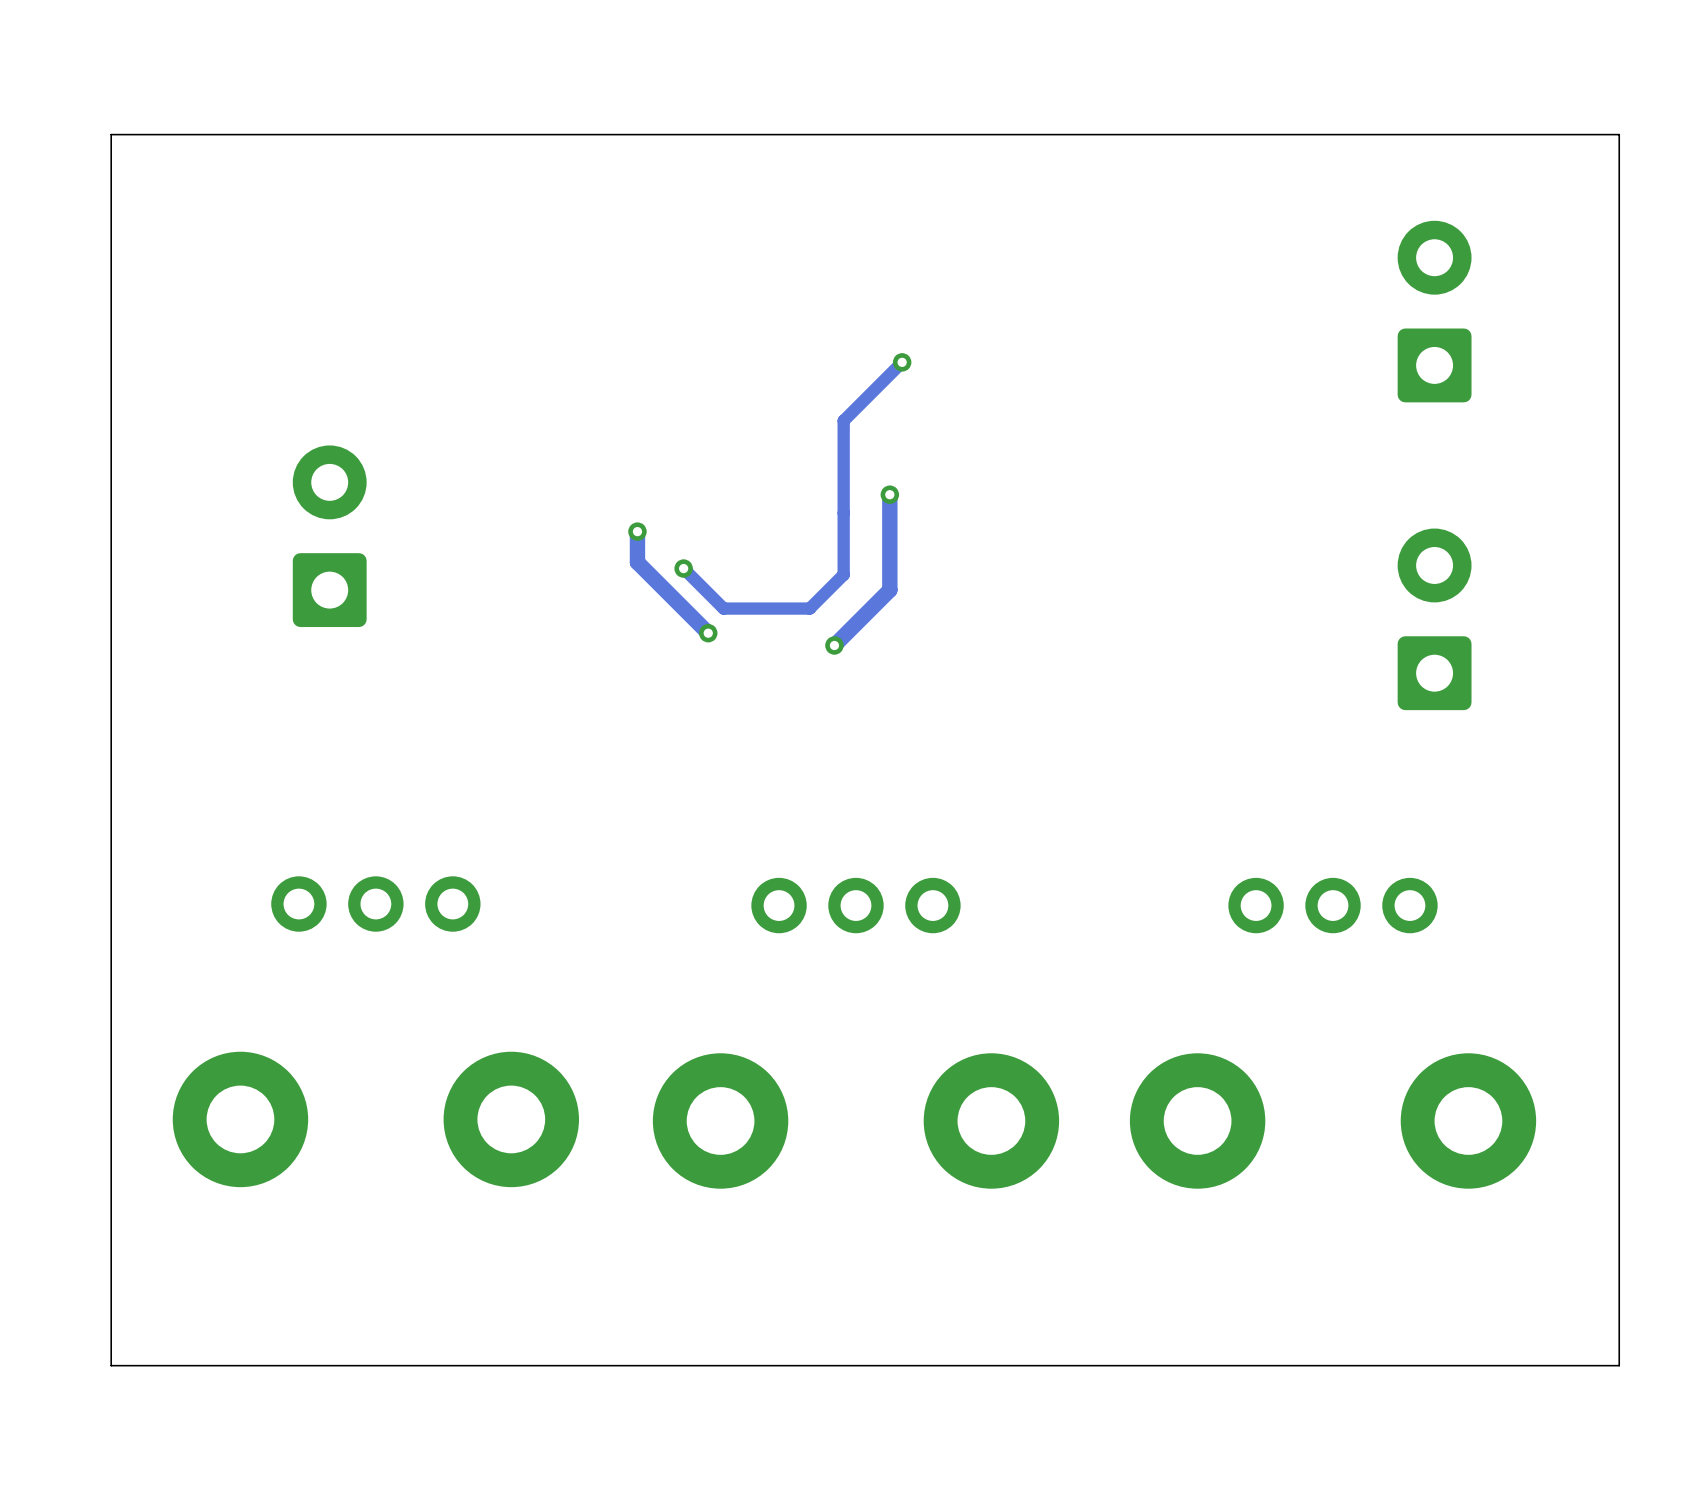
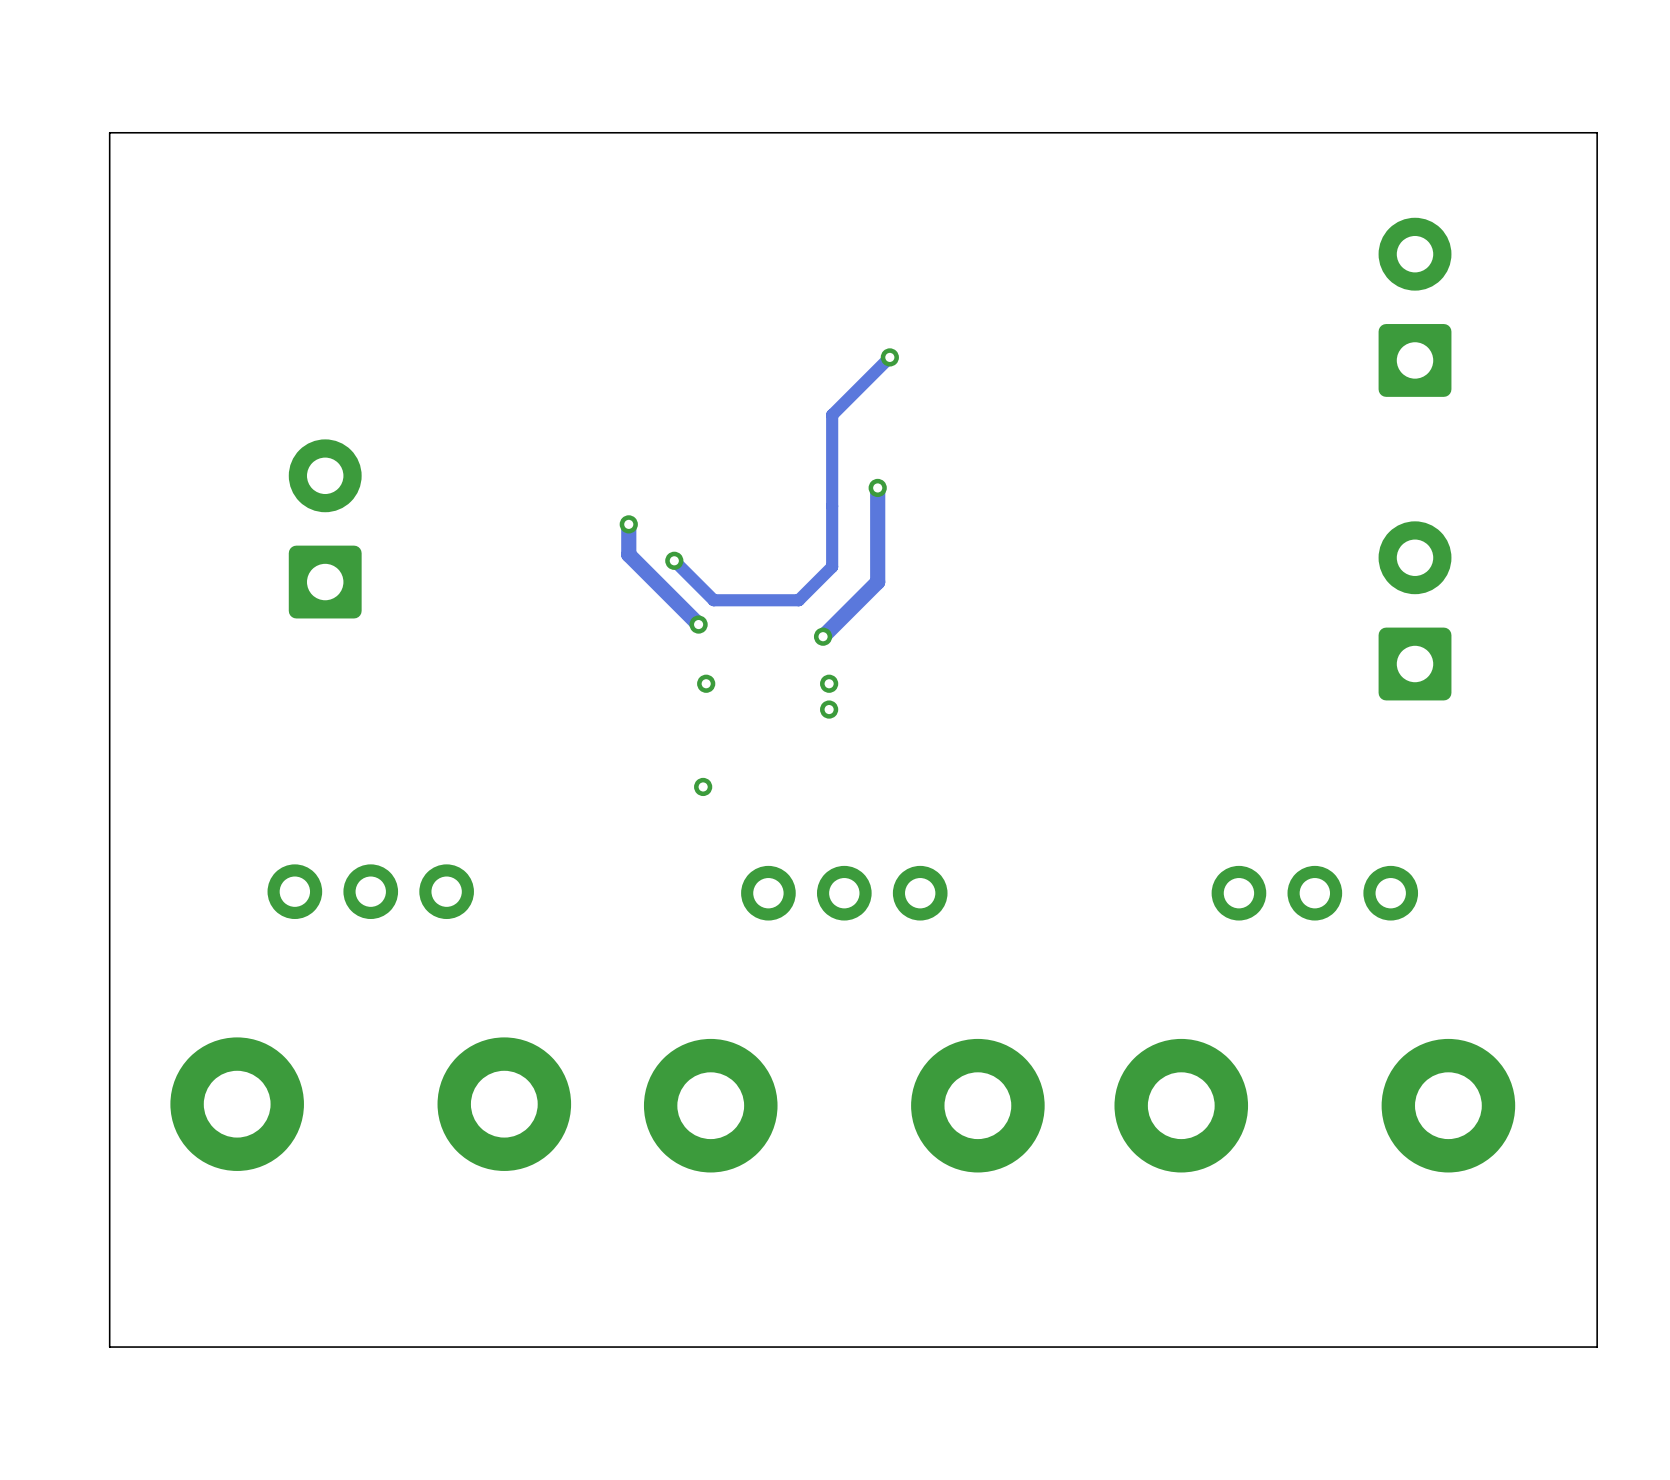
via: none -> (706, 683)
via: none -> (829, 683)
via: none -> (829, 709)
via: none -> (703, 786)

